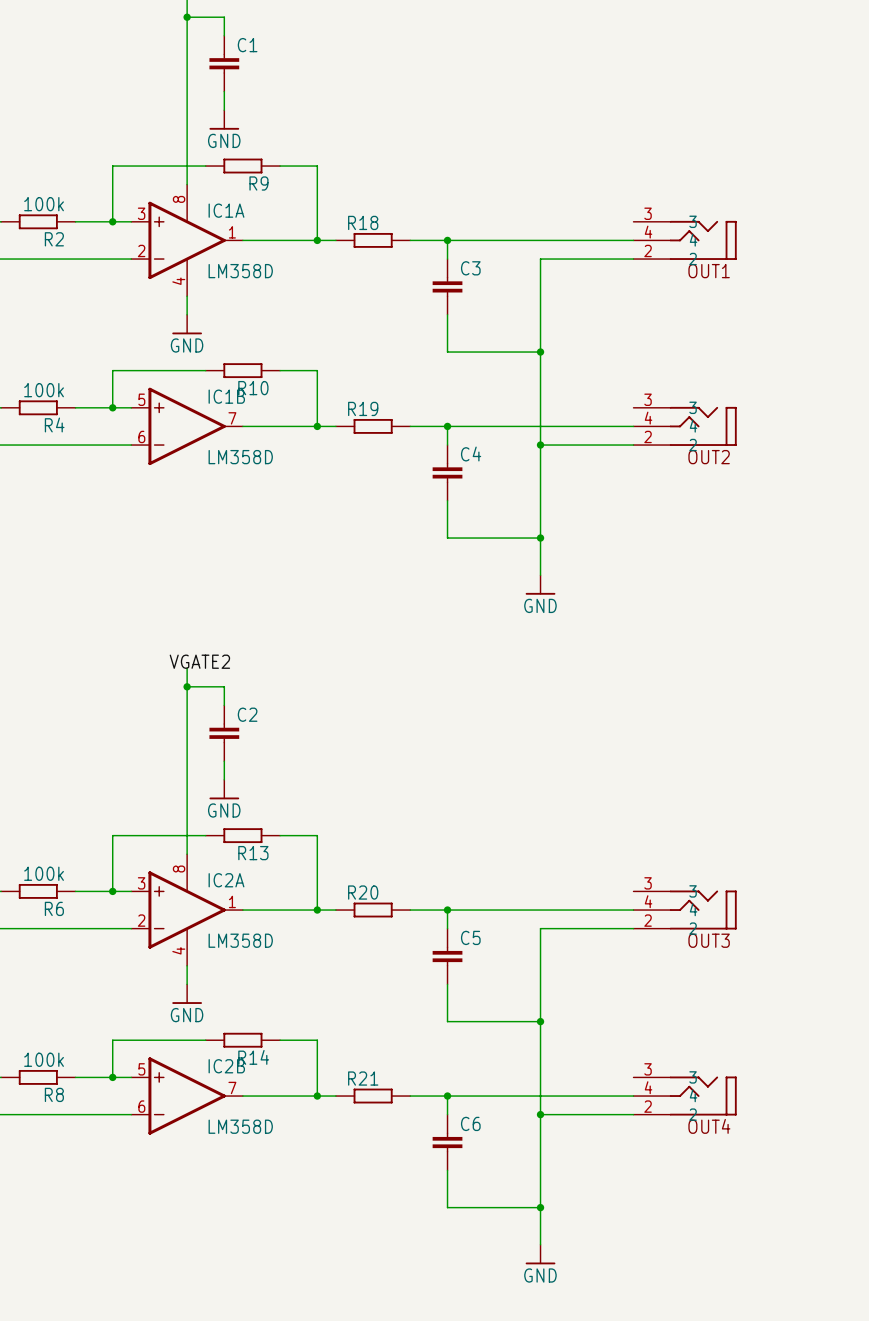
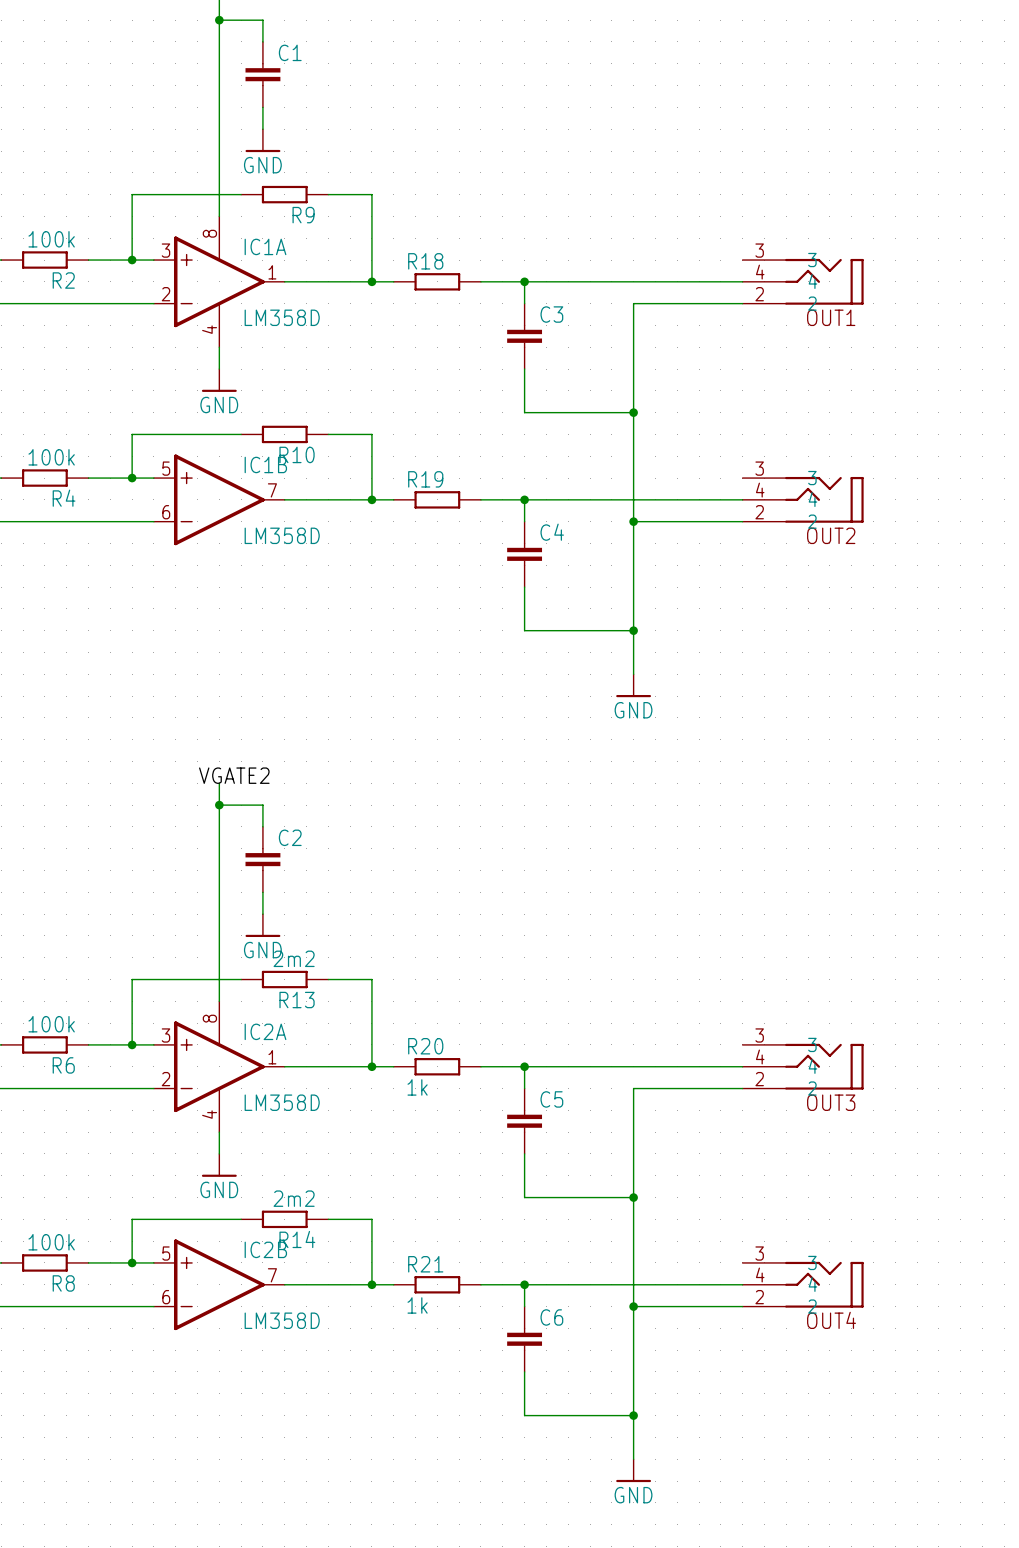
R13 value: none -> 2m2 (294, 958)
R20 value: none -> 1k (417, 1087)
R14 value: none -> 2m2 (294, 1198)
R21 value: none -> 1k (417, 1305)

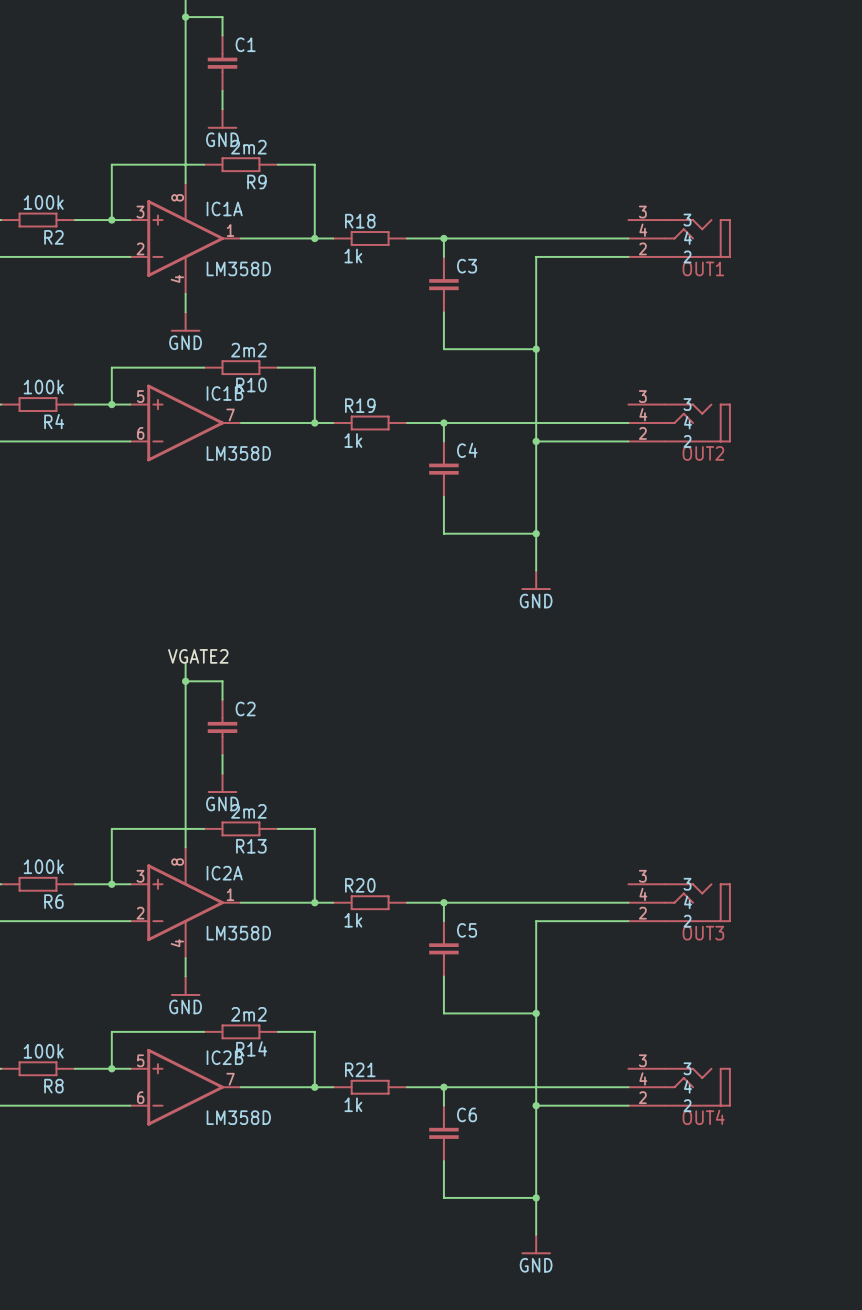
R9 value: none -> 2m2 (248, 147)
R18 value: none -> 1k (353, 256)
R10 value: none -> 2m2 (248, 350)
R19 value: none -> 1k (353, 440)

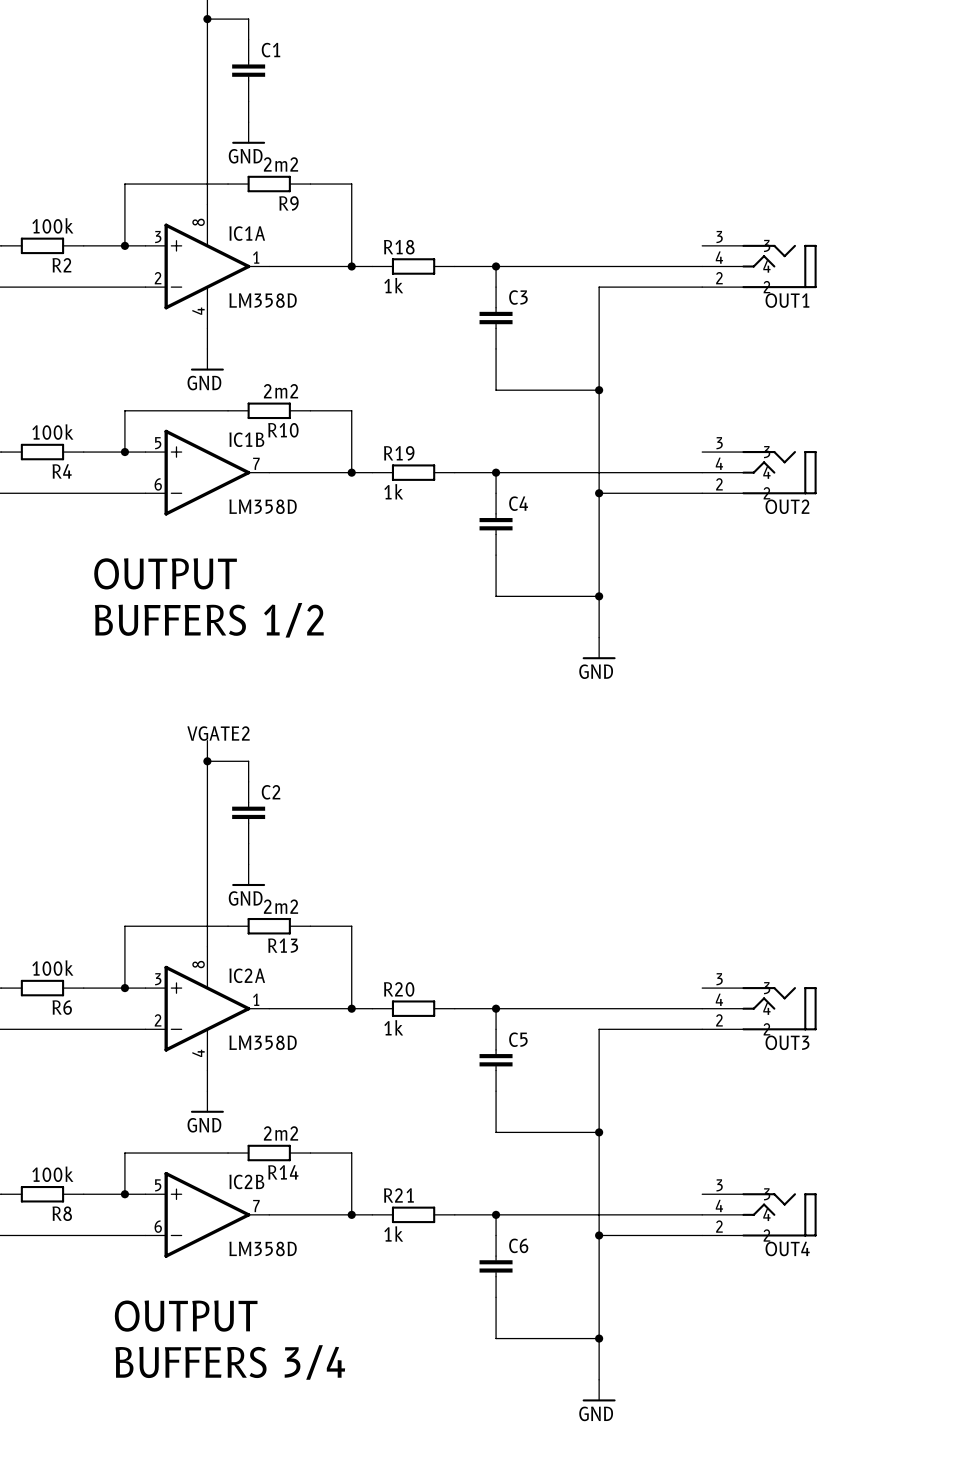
text: none -> OUTPUT (165, 573)
text: none -> BUFFERS 1/2 (209, 620)
text: none -> OUTPUT (186, 1316)
text: none -> BUFFERS 3/4 (230, 1362)

